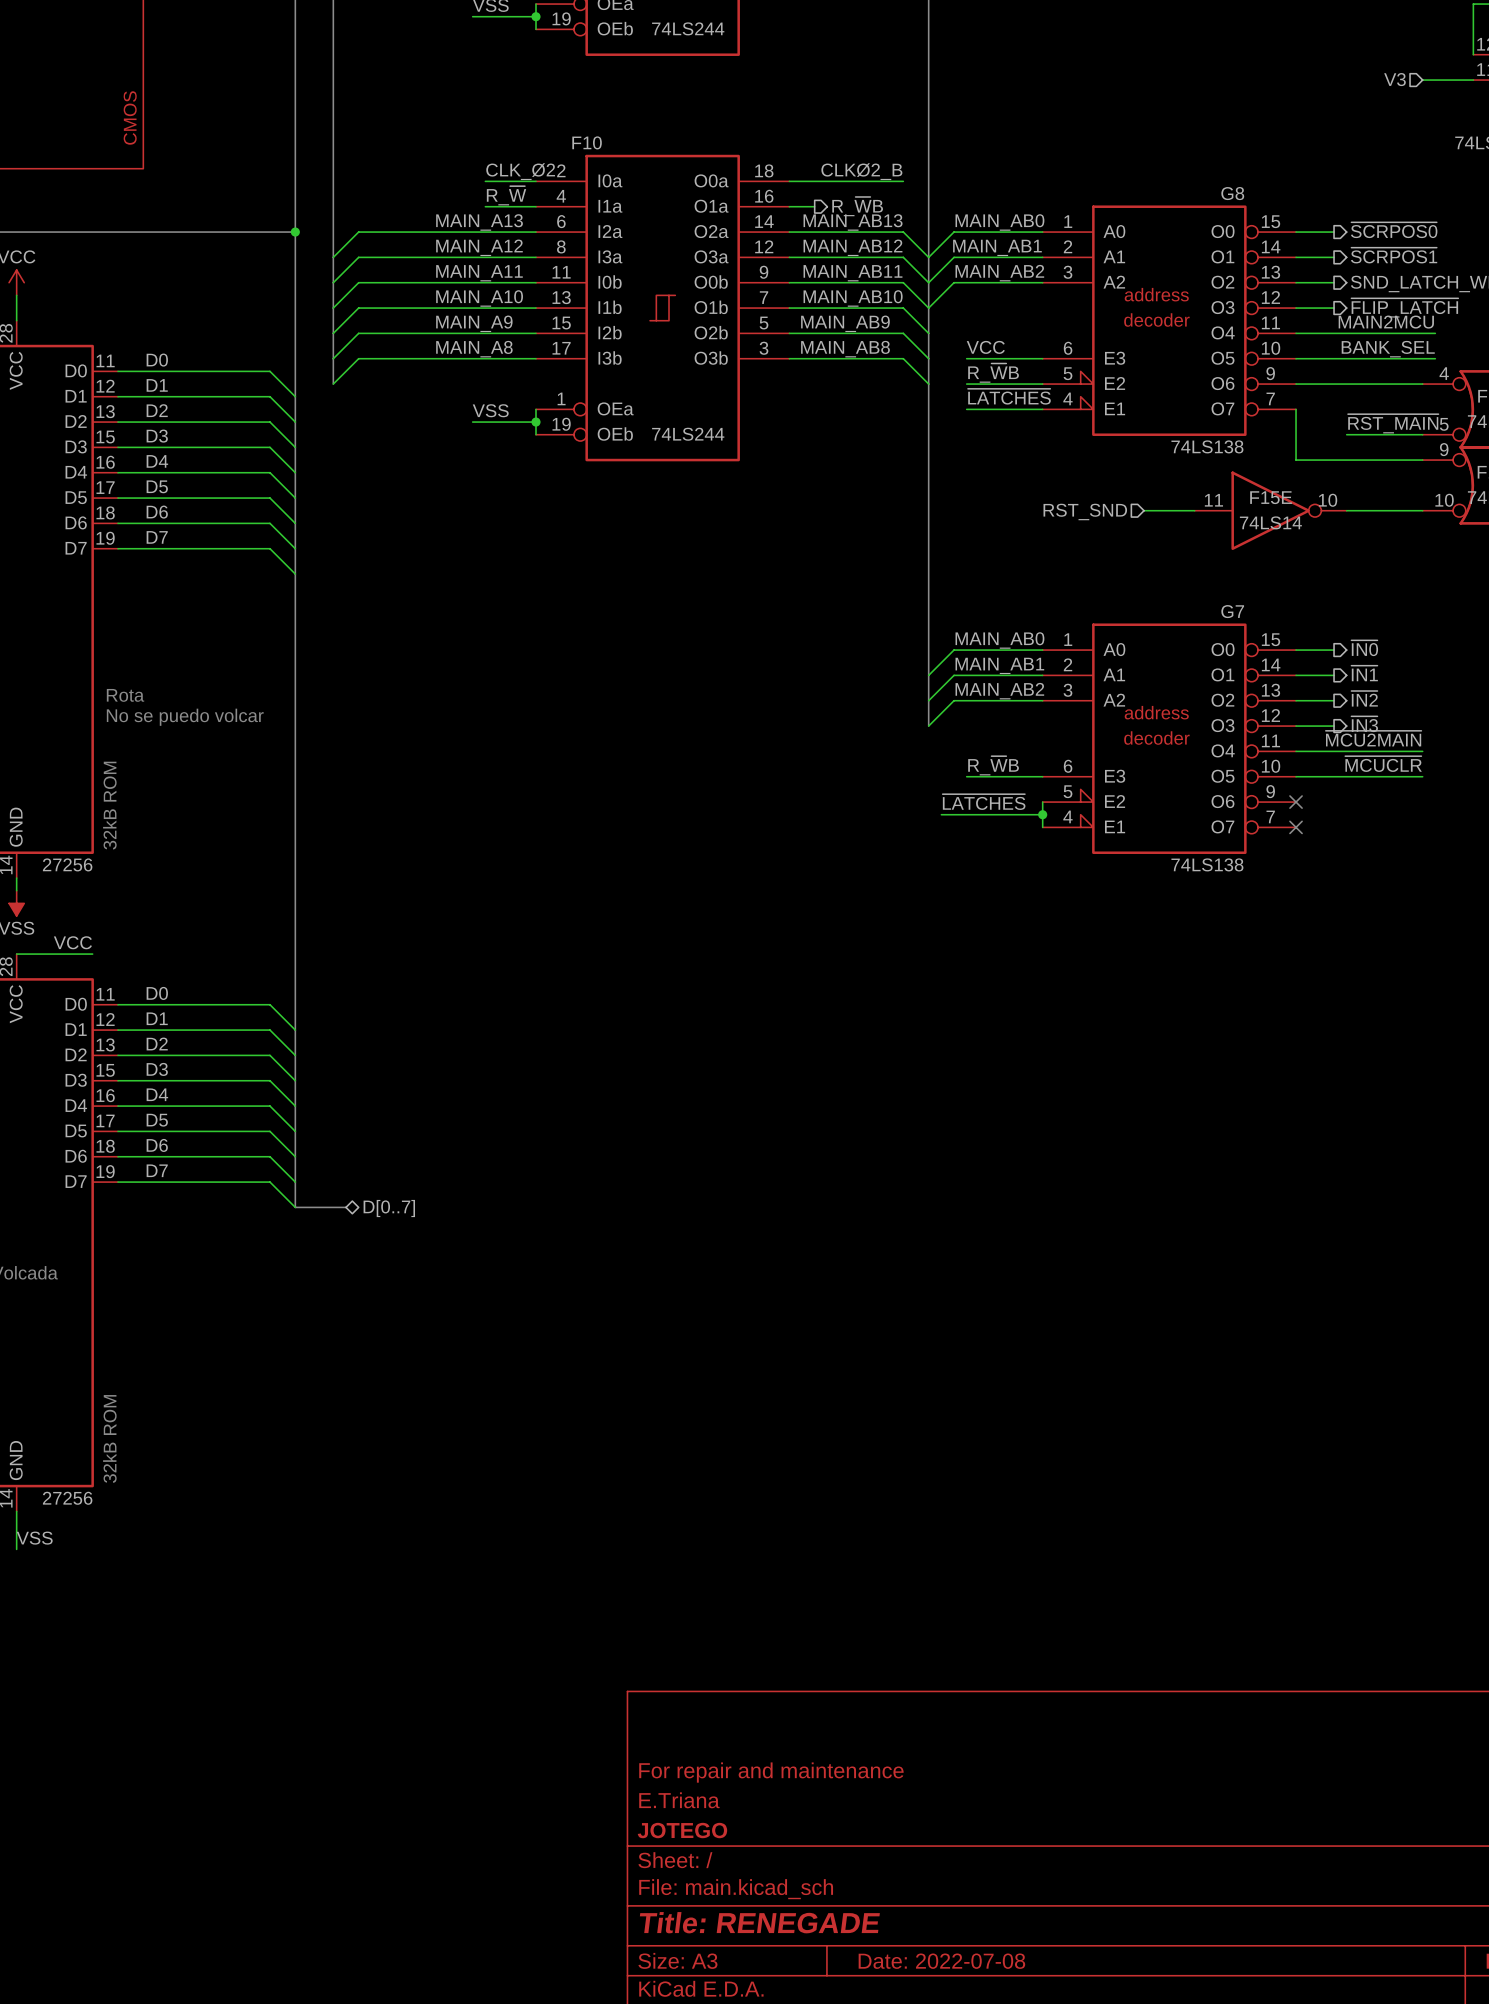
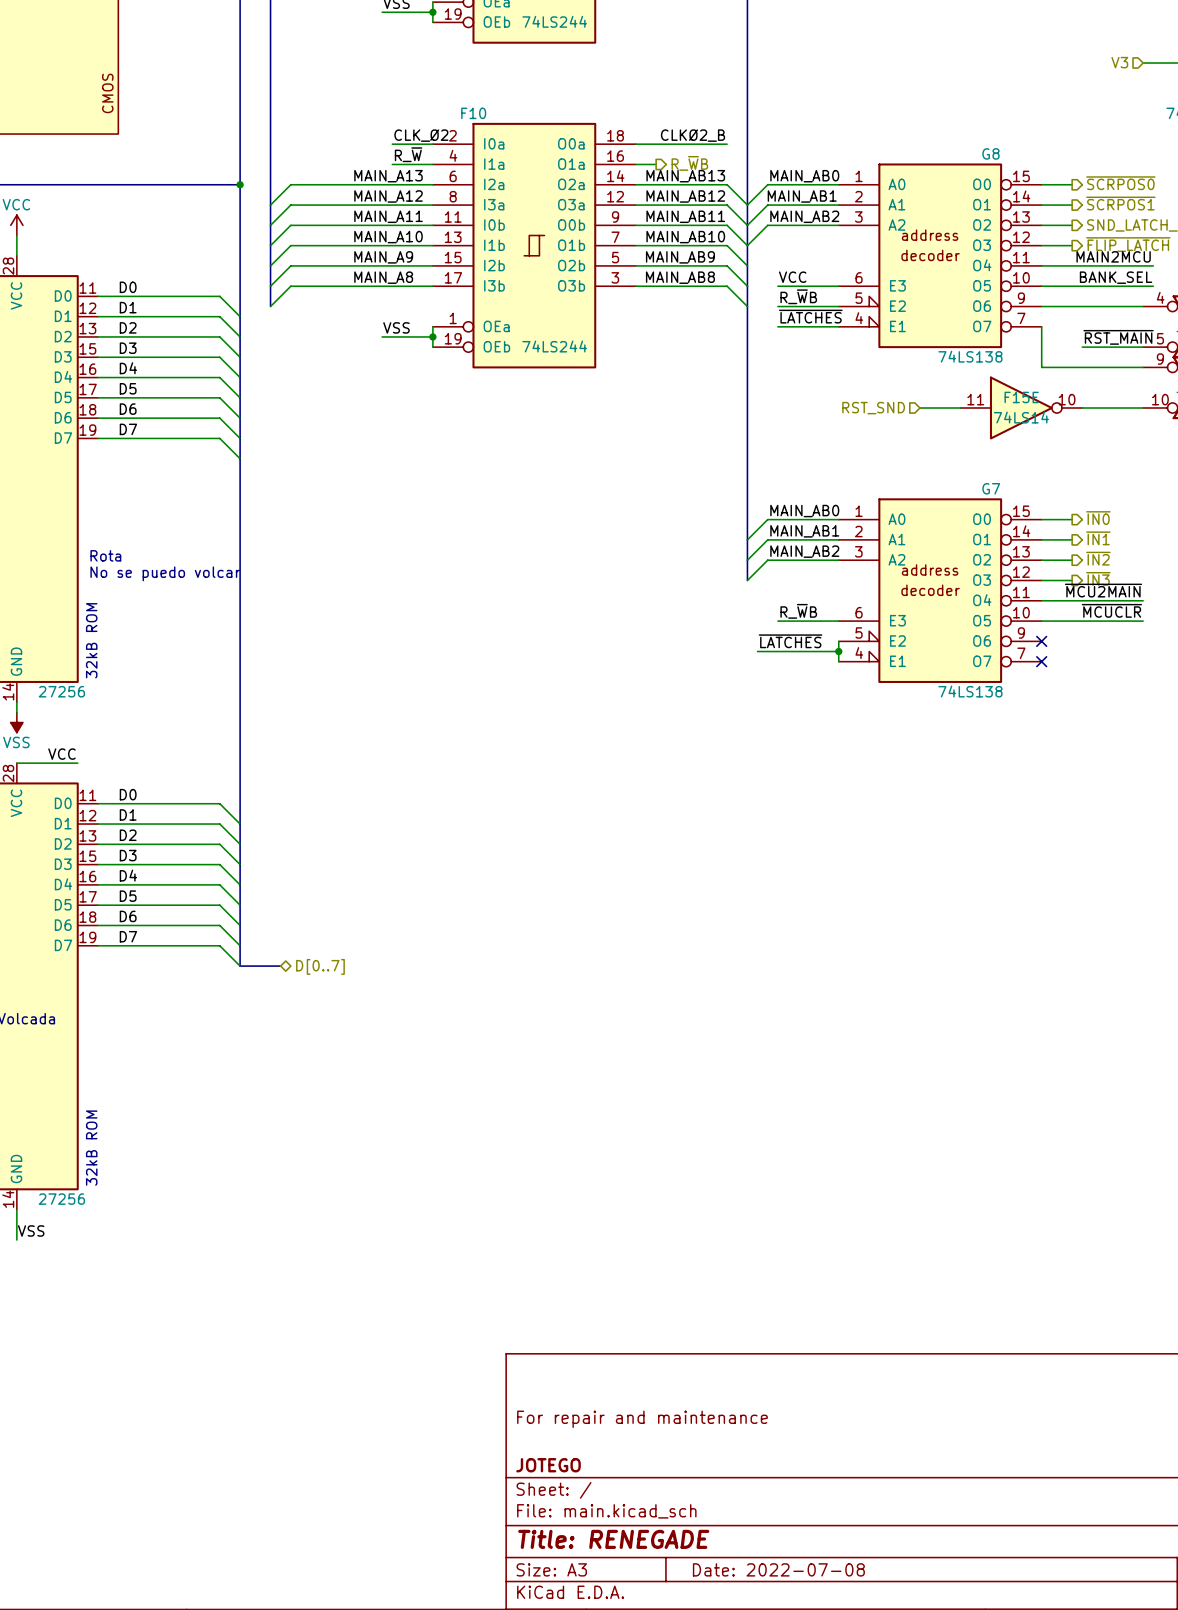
title block: E.Triana (679, 1800) -> none

